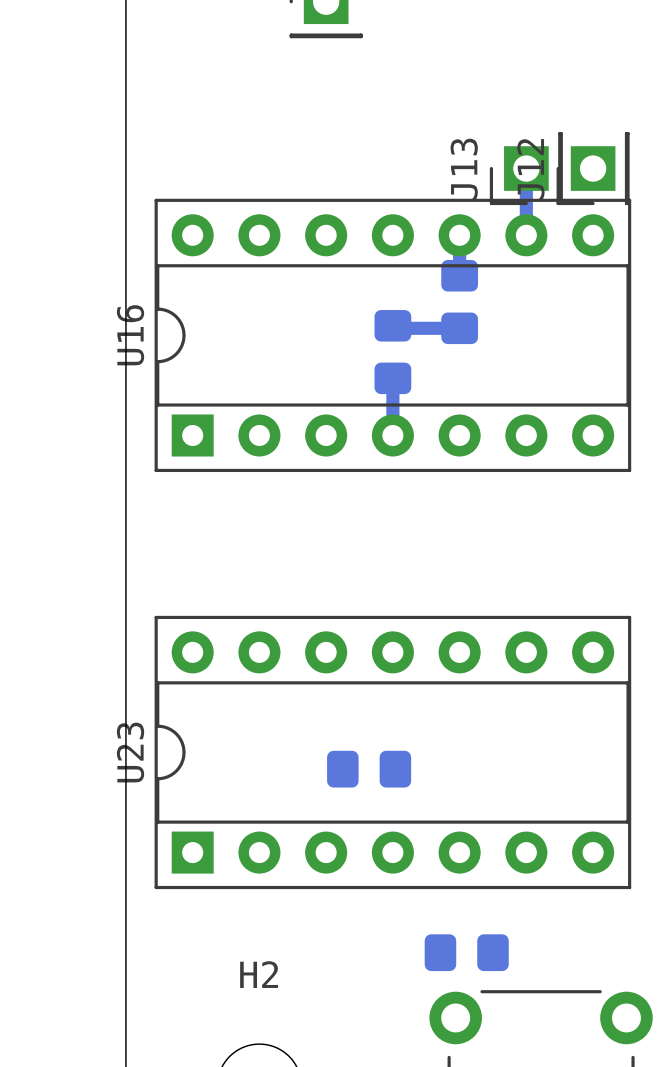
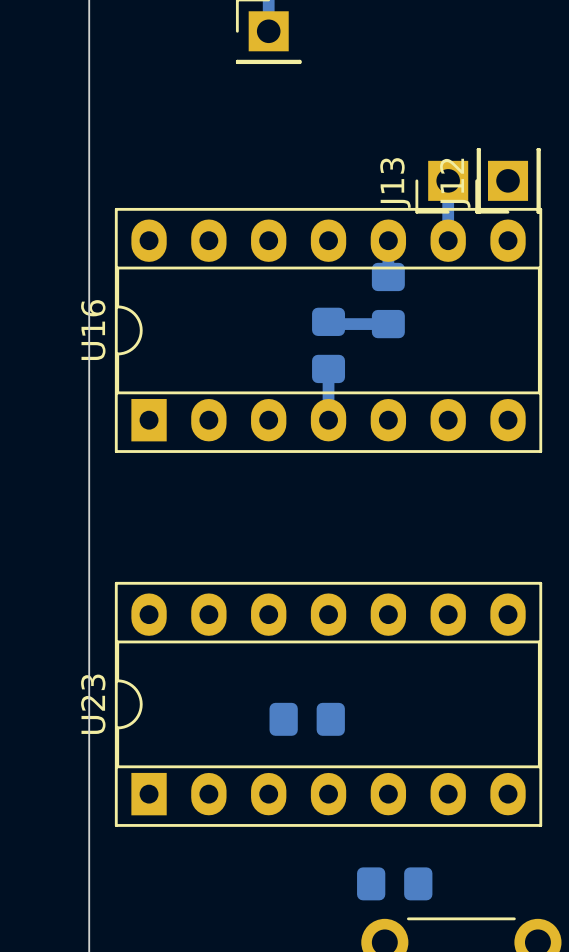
U16 footprint: [154, 198, 632, 473] -> [114, 207, 543, 453]
U23 footprint: [154, 615, 632, 890] -> [114, 581, 543, 827]
H2 name: H2 (259, 974) -> none

